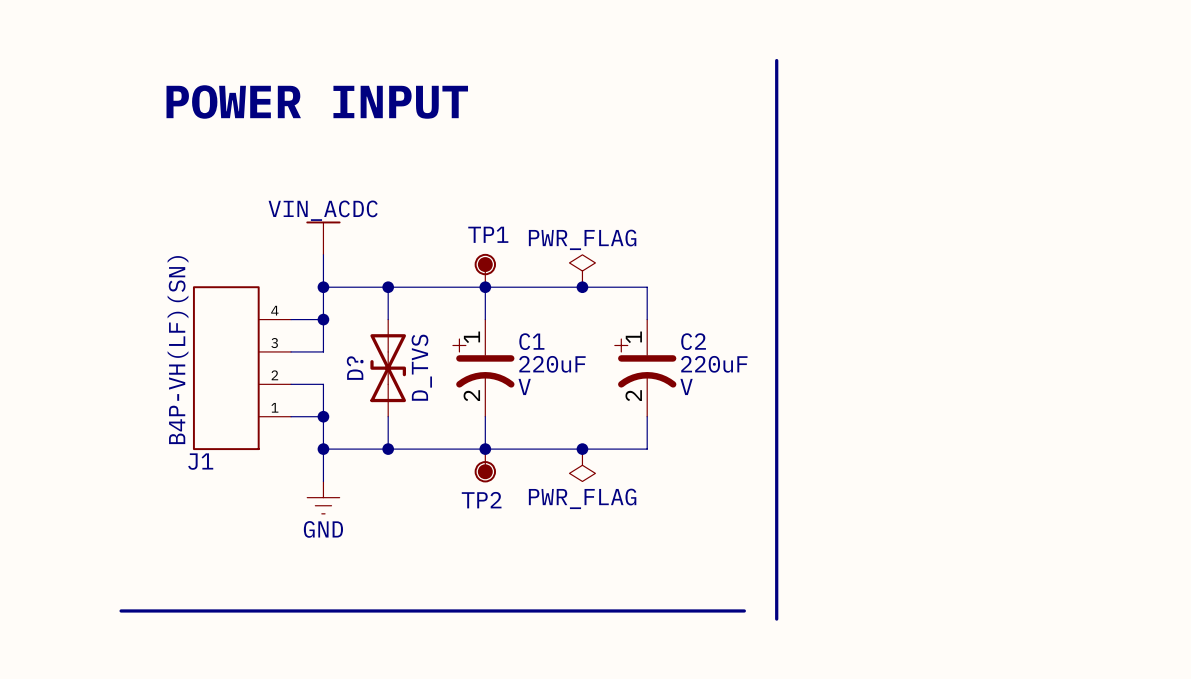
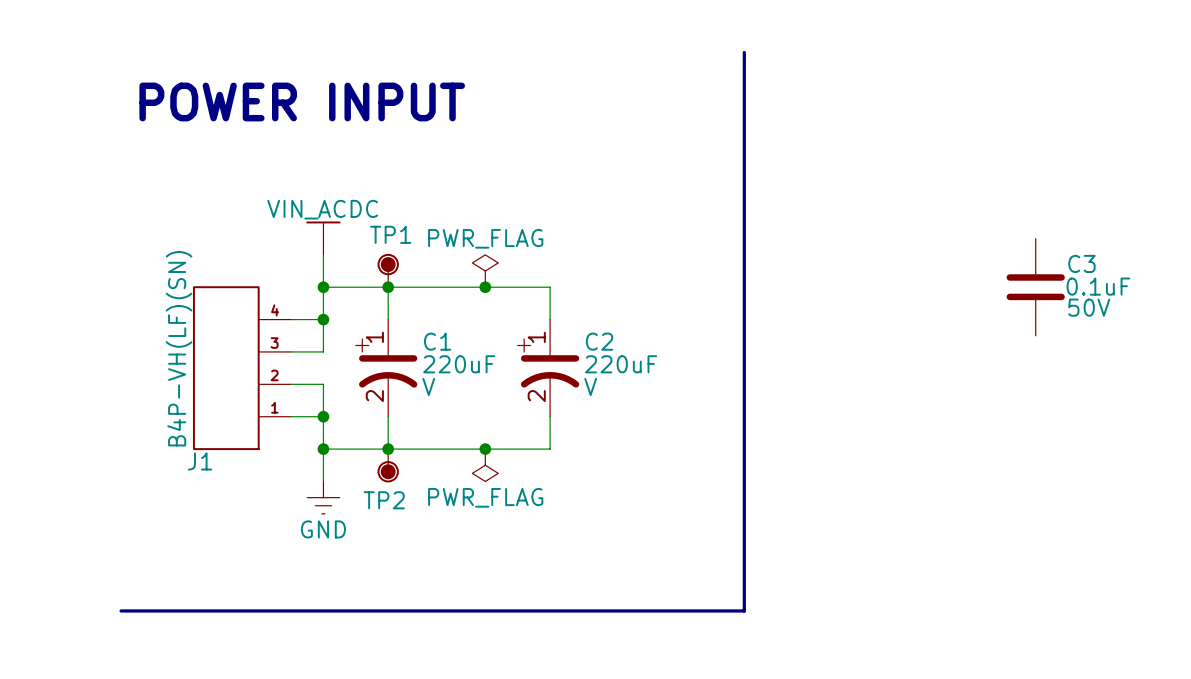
line: (776, 60) (776, 619) -> (744, 52) (744, 610)
TP1 position: (485, 270) -> (388, 270)
power symbol position: PWR_FLAG (582, 271) -> PWR_FLAG (485, 271)
wire: (485, 287) (485, 319) -> none
wire: (550, 287) (647, 287) (647, 319) -> (550, 287) (550, 319)
junction: (582, 287) -> none
C3: none -> 0.1uF (1035, 287)
D?: D_TVS (388, 368) -> none
C1 position: (483, 368) -> (386, 368)
C2 position: (645, 368) -> (548, 368)
wire: (485, 416) (485, 449) -> none
wire: (647, 416) (647, 449) (550, 449) -> (550, 416) (550, 449)
junction: (582, 449) -> none
TP2 position: (485, 465) -> (388, 465)
power symbol position: PWR_FLAG (582, 465) -> PWR_FLAG (485, 465)

